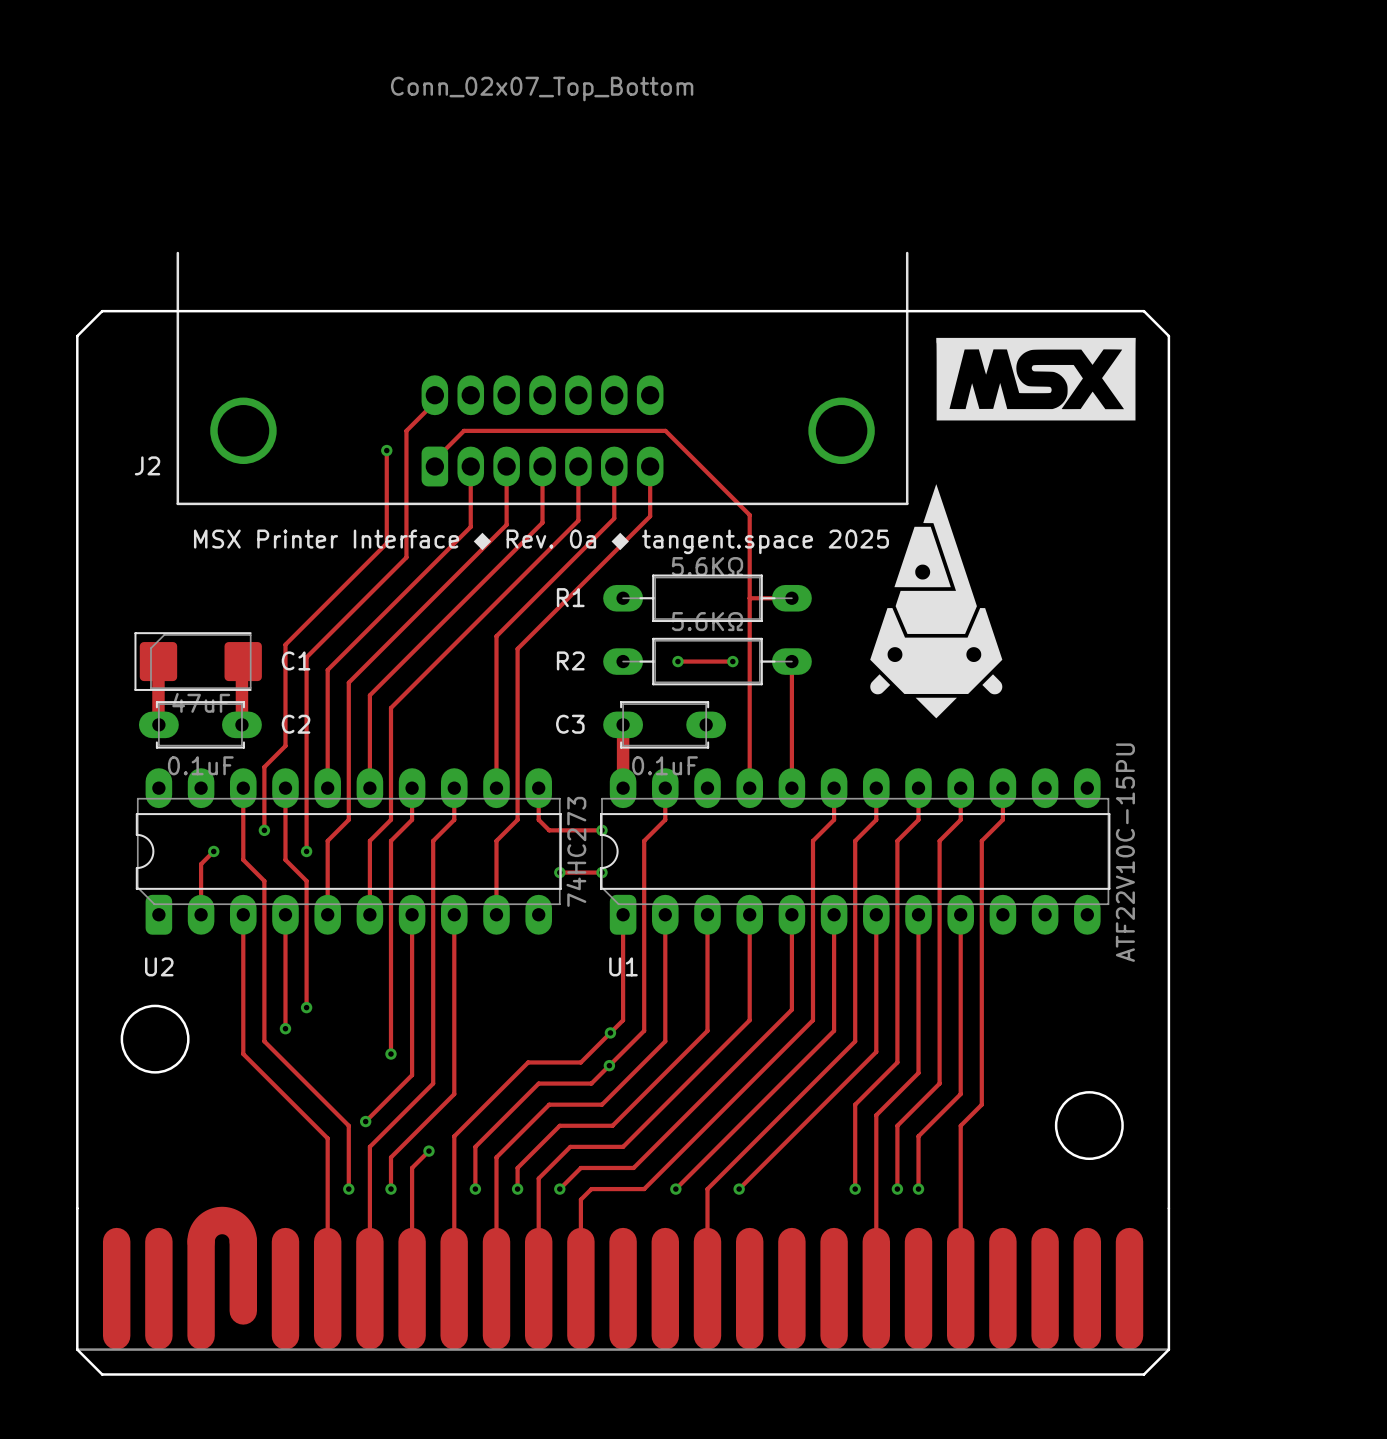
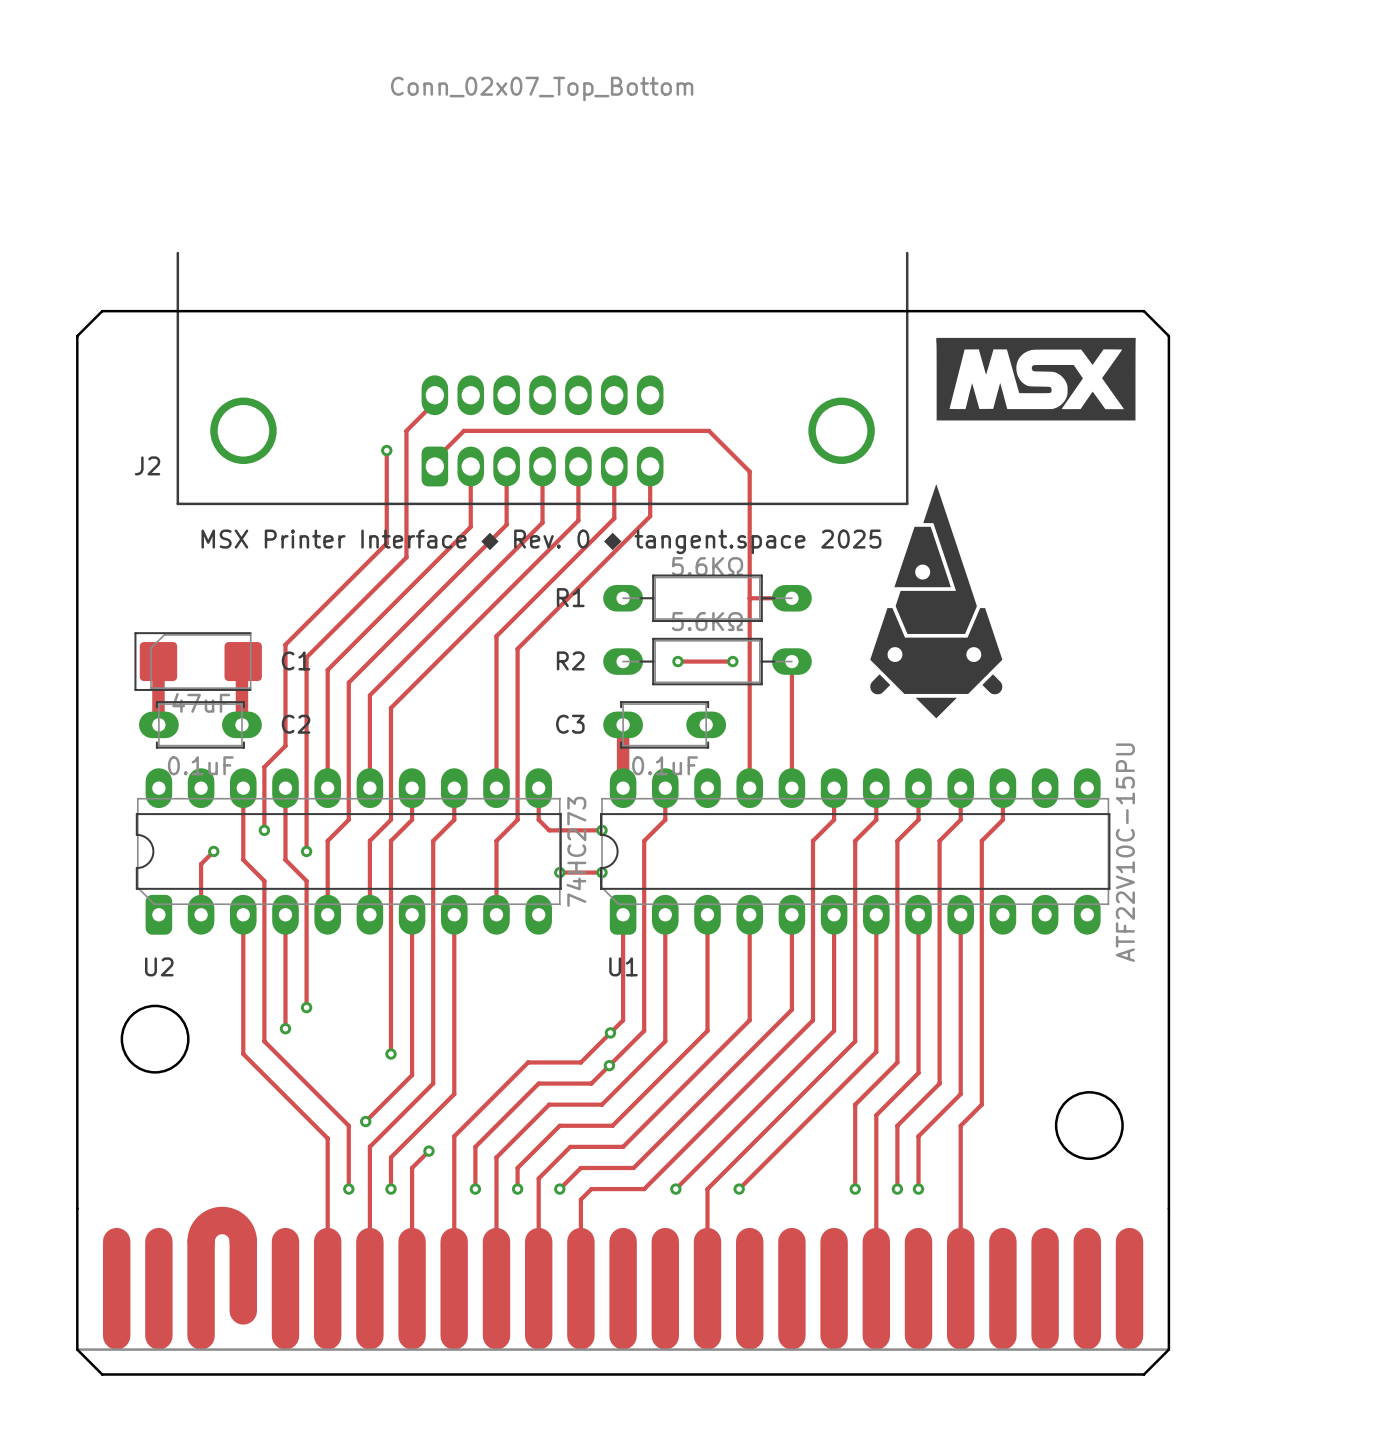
track: (665, 430) (749, 515) -> (665, 430) (708, 430) (749, 471) (749, 515)
text: MSX Printer Interface ◆ Rev. 0a ◆ tangent.space 2025 (541, 541) -> MSX Printer Interface ◆ Rev. 0 ◆ tangent.space 2025 (541, 541)

